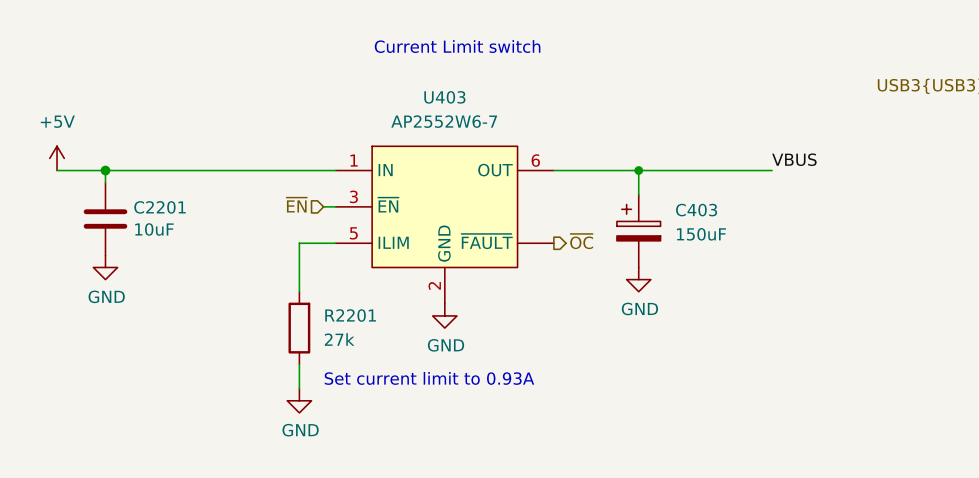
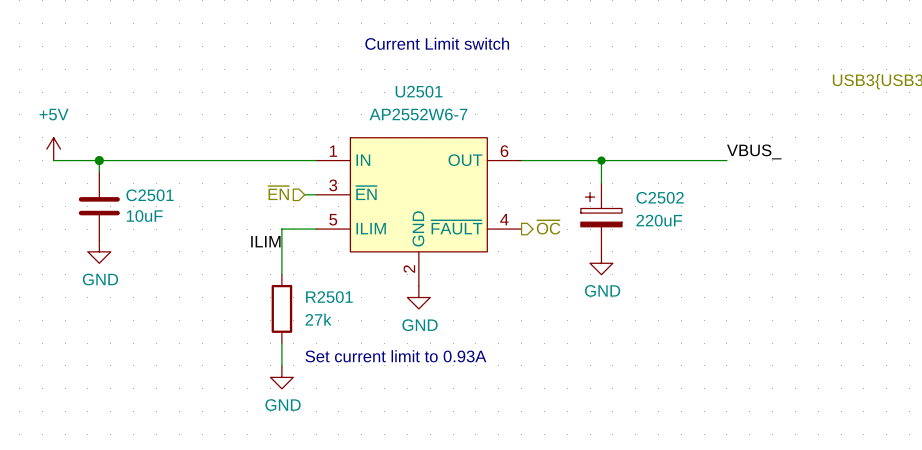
U403 name: U403 (444, 97) -> U2501 (419, 91)
label: VBUS (794, 159) -> VBUS_ (754, 151)
C2201 name: C2201 (160, 207) -> C2501 (150, 195)
C403 name: C403 (696, 210) -> C2502 (660, 197)
U403 pin number: none -> 4 (504, 219)
C403 value: 150uF (701, 234) -> 220uF (659, 220)
label: none -> ILIM (265, 241)
R2201 name: R2201 (350, 315) -> R2501 (329, 297)

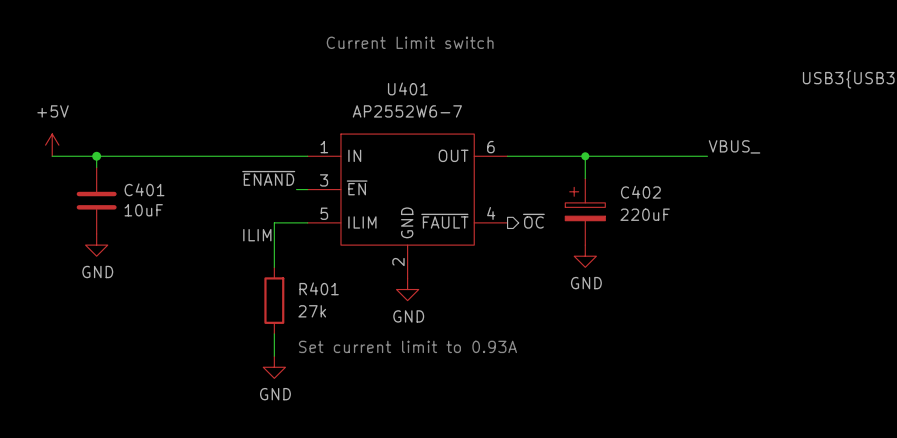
U2501 name: U2501 (419, 91) -> U401 (407, 88)
label: none -> ~{ENAND} (268, 178)
hierarchical label: ~{EN} (278, 193) -> none
C2501 name: C2501 (150, 195) -> C401 (144, 189)
C2502 name: C2502 (660, 197) -> C402 (640, 192)
R2501 name: R2501 (329, 297) -> R401 (319, 288)

